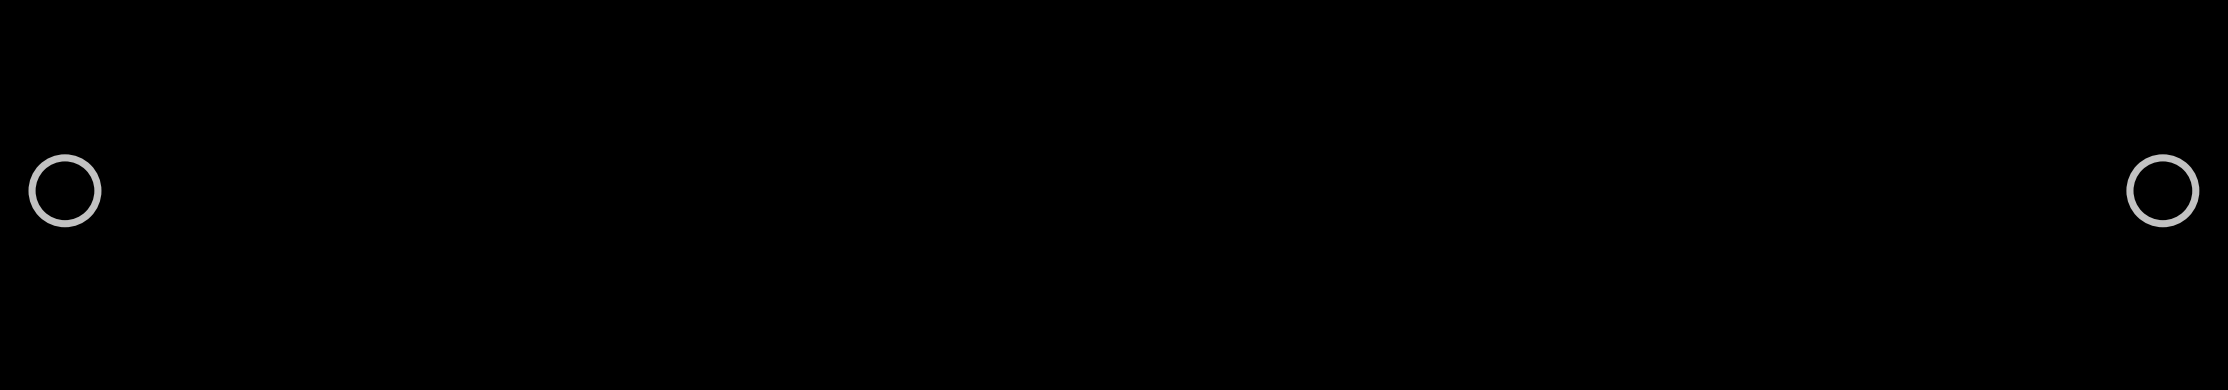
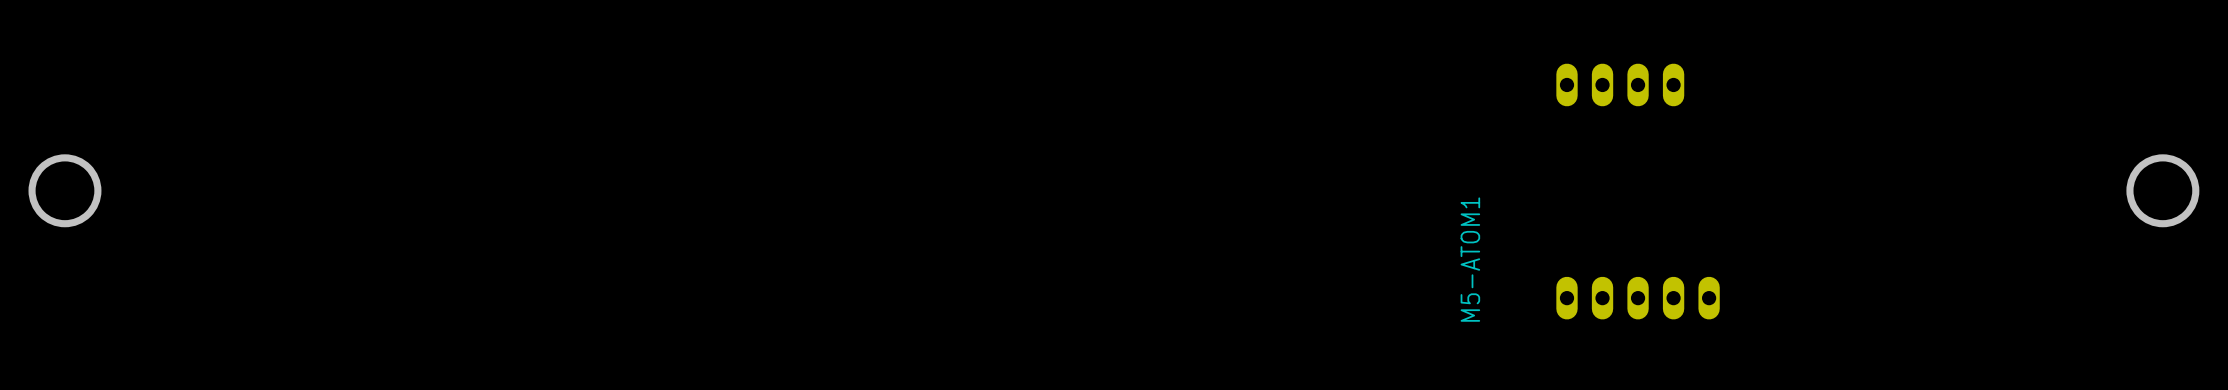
M5-ATOM1: none -> (1638, 191)

